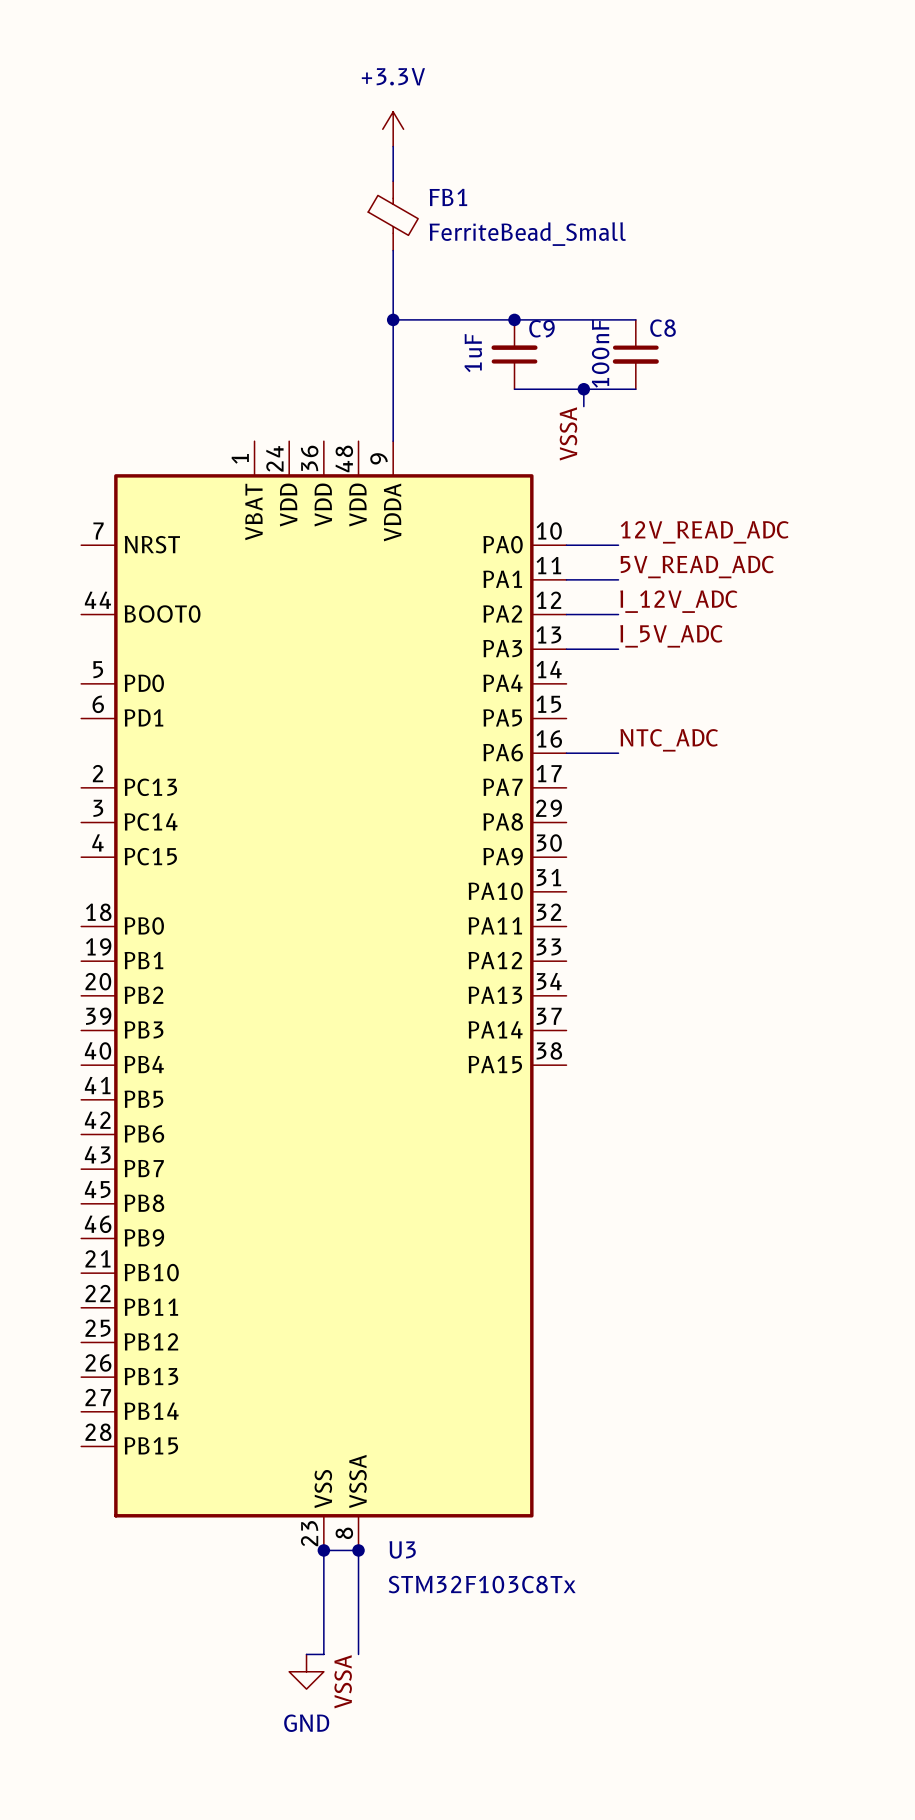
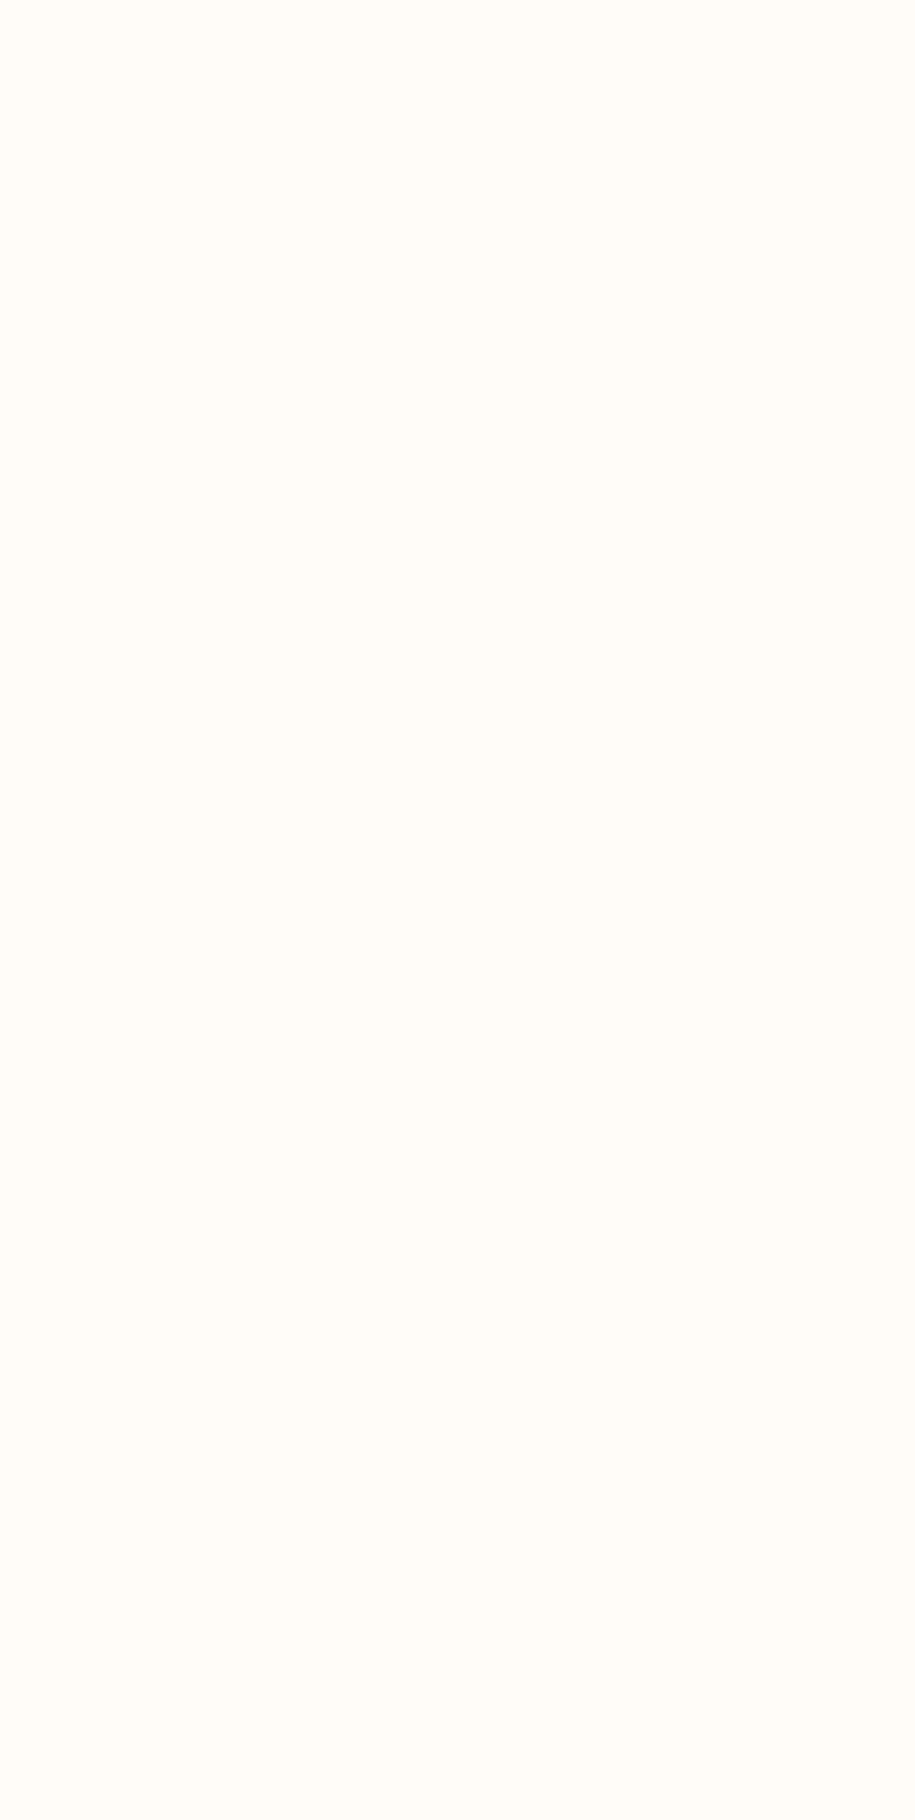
power symbol: +3.3V (393, 129) -> none
wire: (393, 146) (393, 181) -> none
FB1: FerriteBead_Small (393, 215) -> none
wire: (393, 250) (393, 441) -> none
wire: (393, 319) (635, 319) -> none
junction: (393, 319) -> none
junction: (514, 319) -> none
C9: 1uF (514, 354) -> none
C8: 100nF (635, 354) -> none
wire: (514, 389) (635, 389) -> none
wire: (583, 389) (583, 406) -> none
junction: (583, 389) -> none
label: VSSA (568, 433) -> none
label: 12V_READ_ADC (704, 532) -> none
wire: (566, 545) (618, 545) -> none
label: 5V_READ_ADC (697, 567) -> none
wire: (566, 579) (618, 579) -> none
label: I_12V_ADC (678, 601) -> none
wire: (566, 614) (618, 614) -> none
label: I_5V_ADC (671, 636) -> none
wire: (566, 649) (618, 649) -> none
label: NTC_ADC (669, 740) -> none
wire: (566, 753) (618, 753) -> none
U3: STM32F103C8Tx (323, 995) -> none
junction: (323, 1550) -> none
junction: (358, 1550) -> none
wire: (306, 1654) (323, 1654) (323, 1550) (358, 1550) (358, 1654) -> none
power symbol: GND (306, 1671) -> none
label: VSSA (343, 1681) -> none

